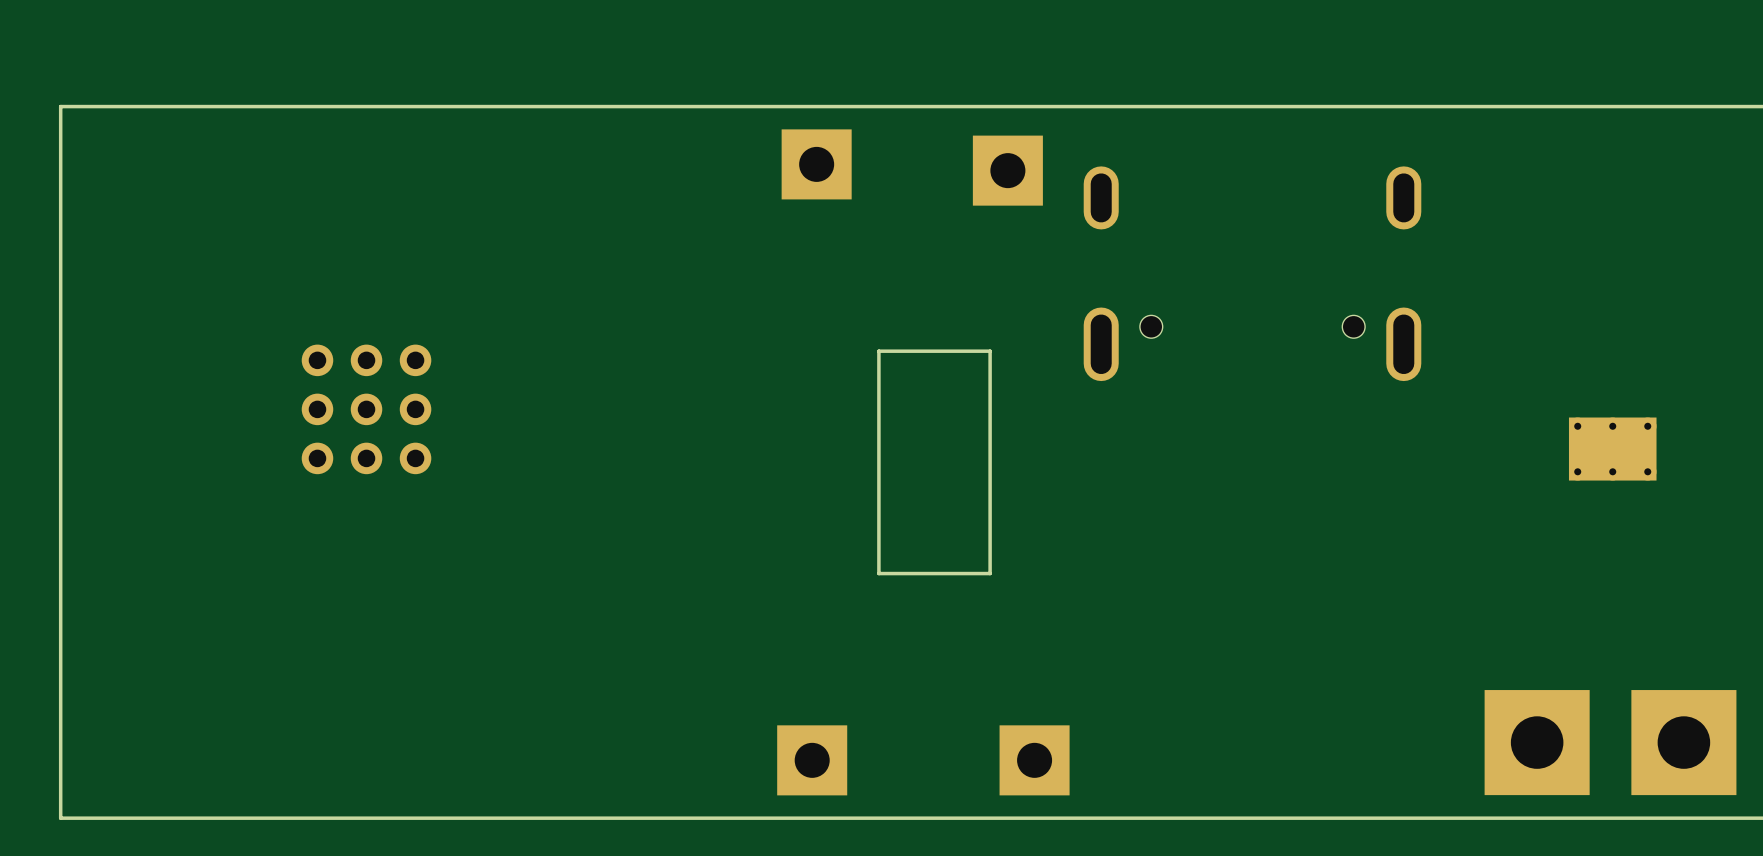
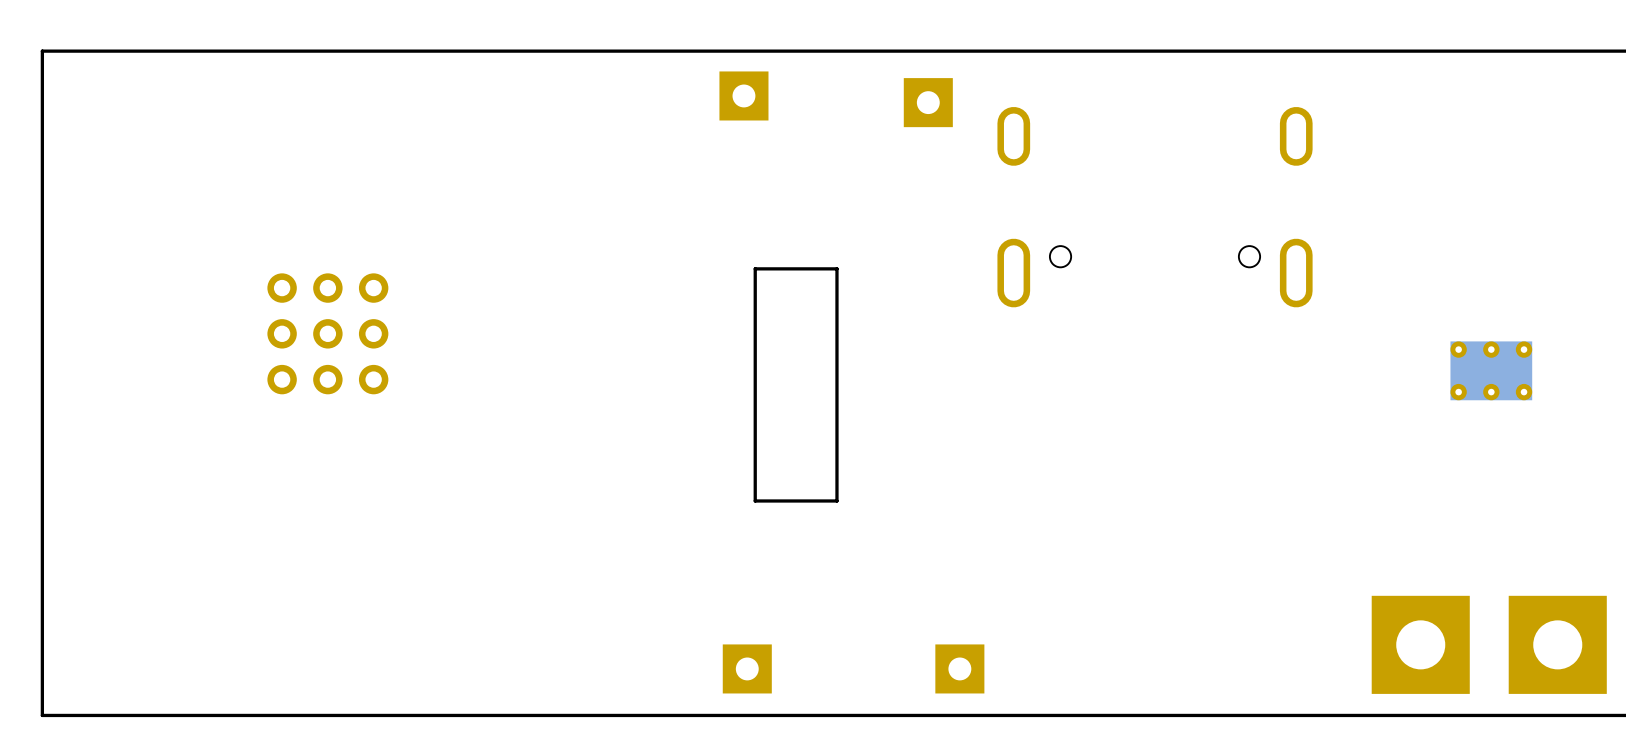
part footprint: [781, 129, 852, 200] -> [719, 71, 769, 121]
part footprint: [972, 135, 1043, 206] -> [903, 78, 953, 128]
board edge: none -> (836, 268) (755, 268) (755, 500) (836, 500) (836, 268)
board edge: (990, 351) (878, 351) (878, 573) (990, 573) (990, 351) -> none
part footprint: [777, 725, 848, 796] -> [722, 644, 772, 694]
part footprint: [999, 725, 1070, 796] -> [935, 644, 985, 694]

